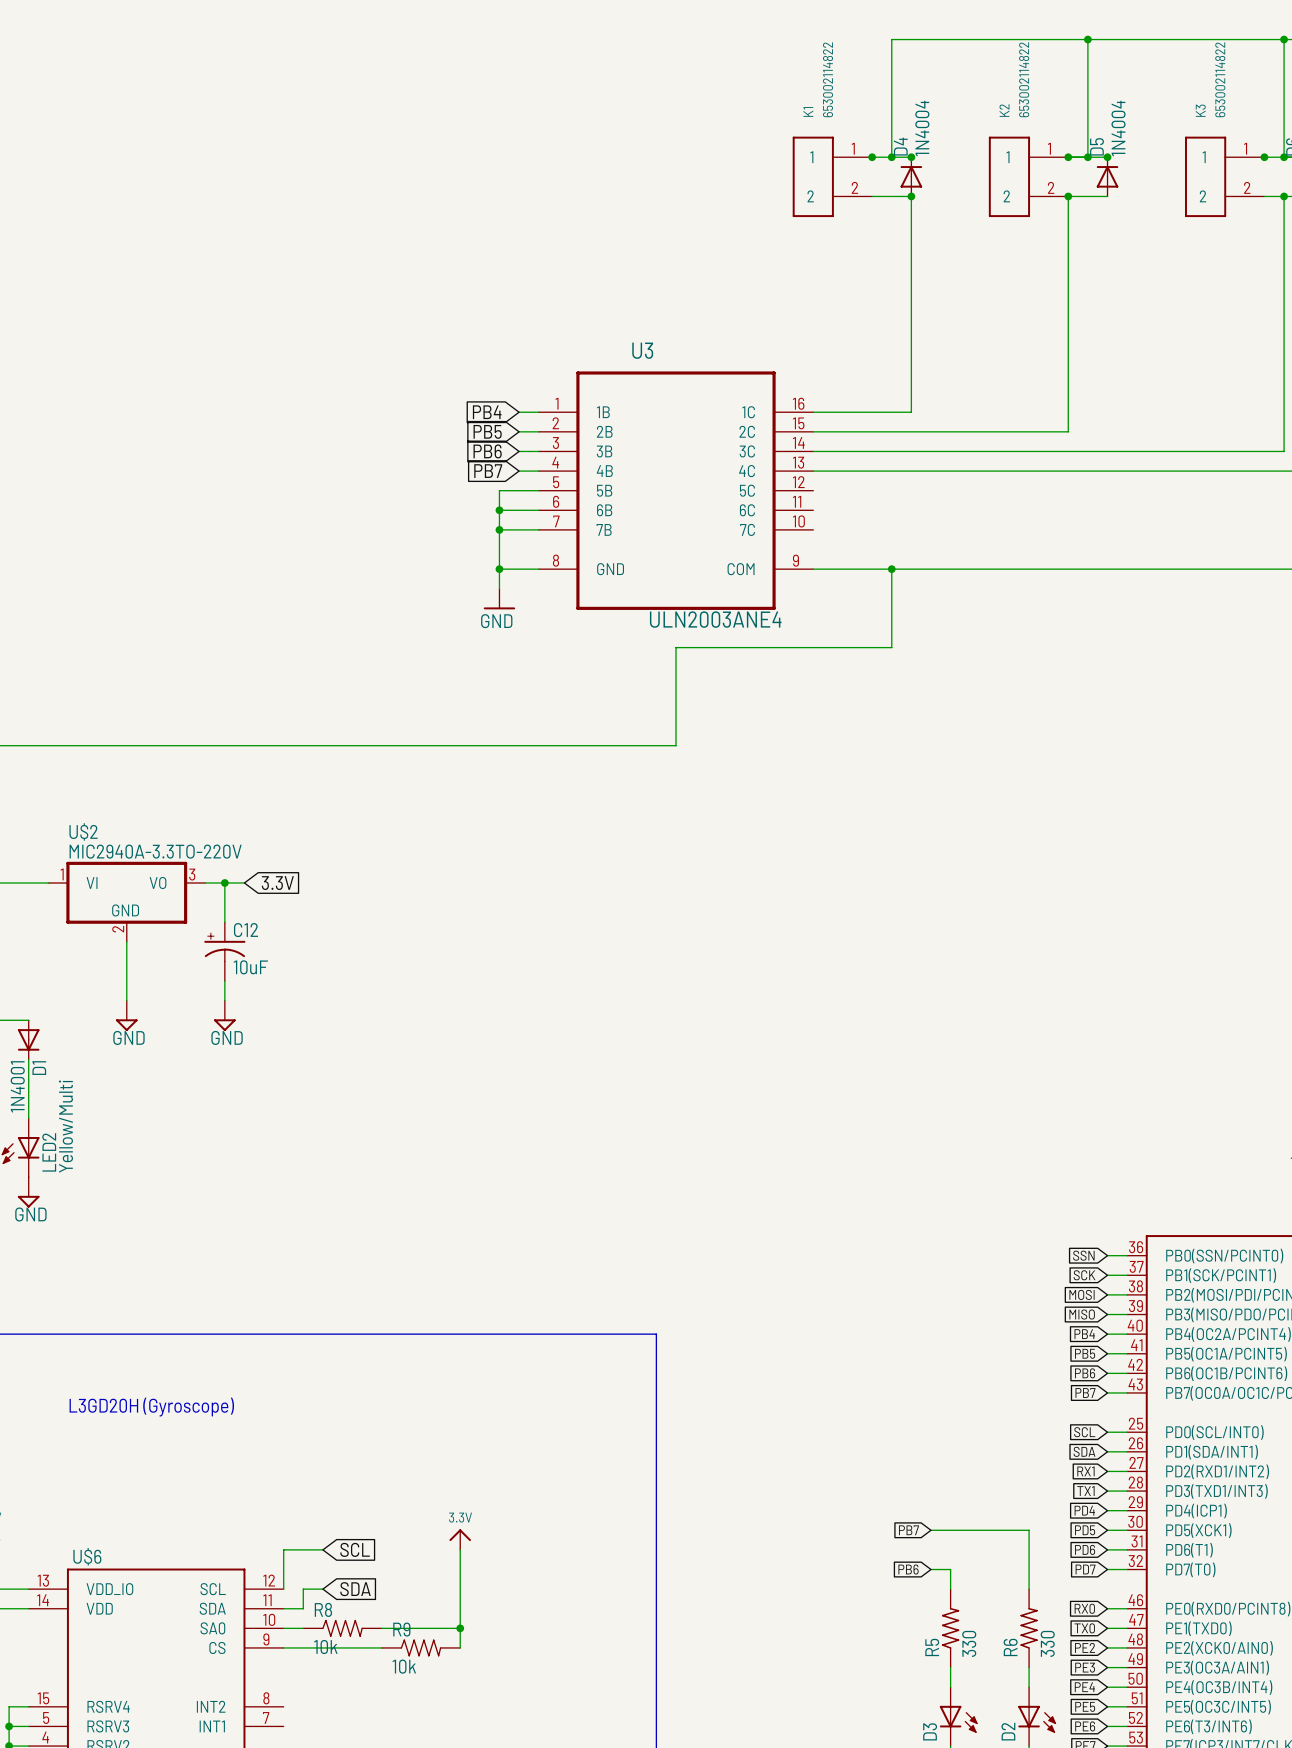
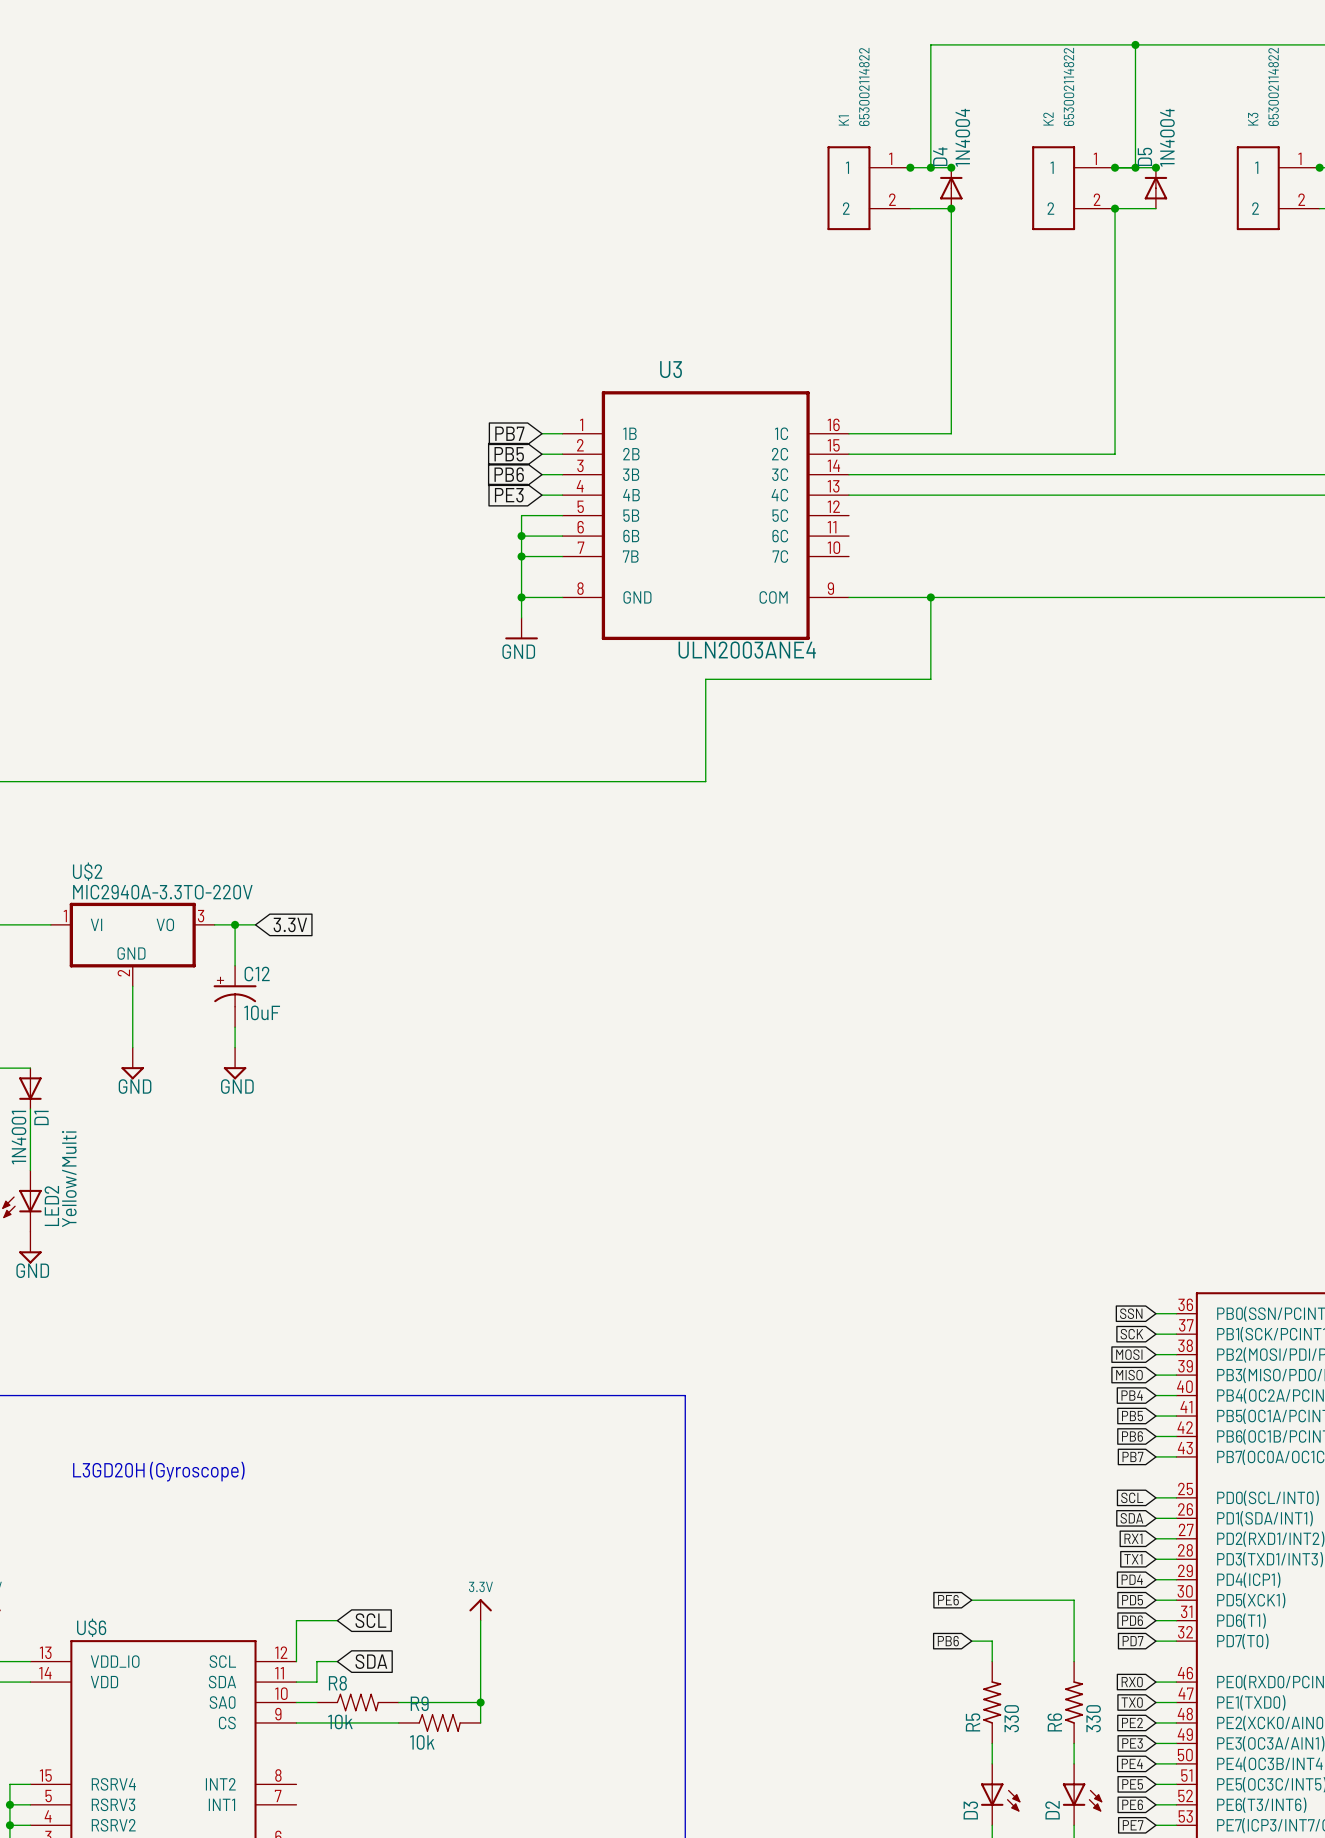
global label: PB4 (487, 412) -> PB7 (509, 433)
global label: PB7 (488, 471) -> PE3 (509, 495)
global label: PB7 (908, 1530) -> PE6 (948, 1600)

